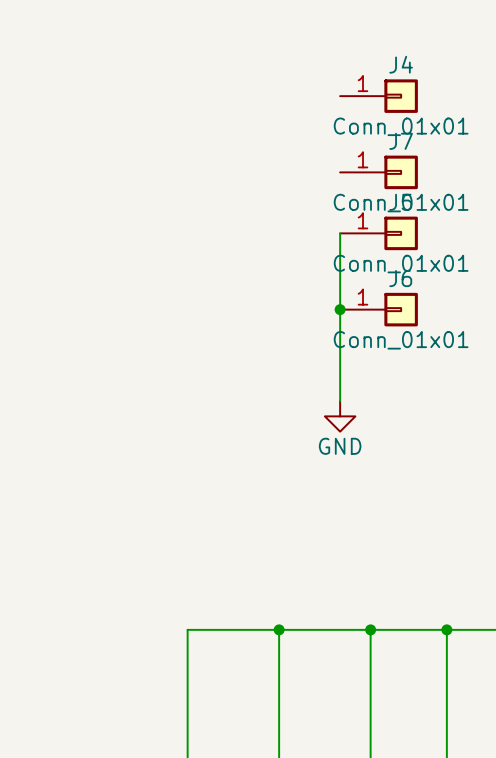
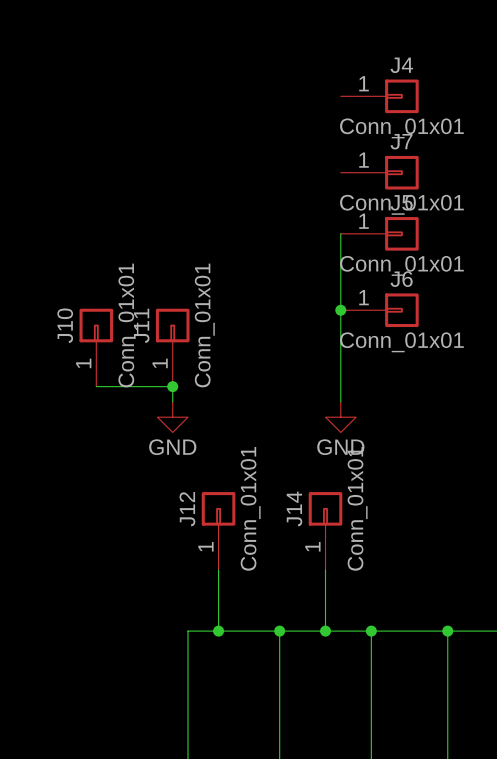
J10: none -> Conn_01x01 (96, 347)
J11: none -> Conn_01x01 (172, 347)
wire: none -> (96, 386) (172, 386) (172, 401)
junction: none -> (172, 386)
power symbol: none -> GND (172, 417)
J12: none -> Conn_01x01 (218, 531)
J14: none -> Conn_01x01 (325, 531)
wire: none -> (218, 569) (218, 631)
wire: none -> (325, 569) (325, 631)
junction: none -> (218, 631)
junction: none -> (325, 631)

